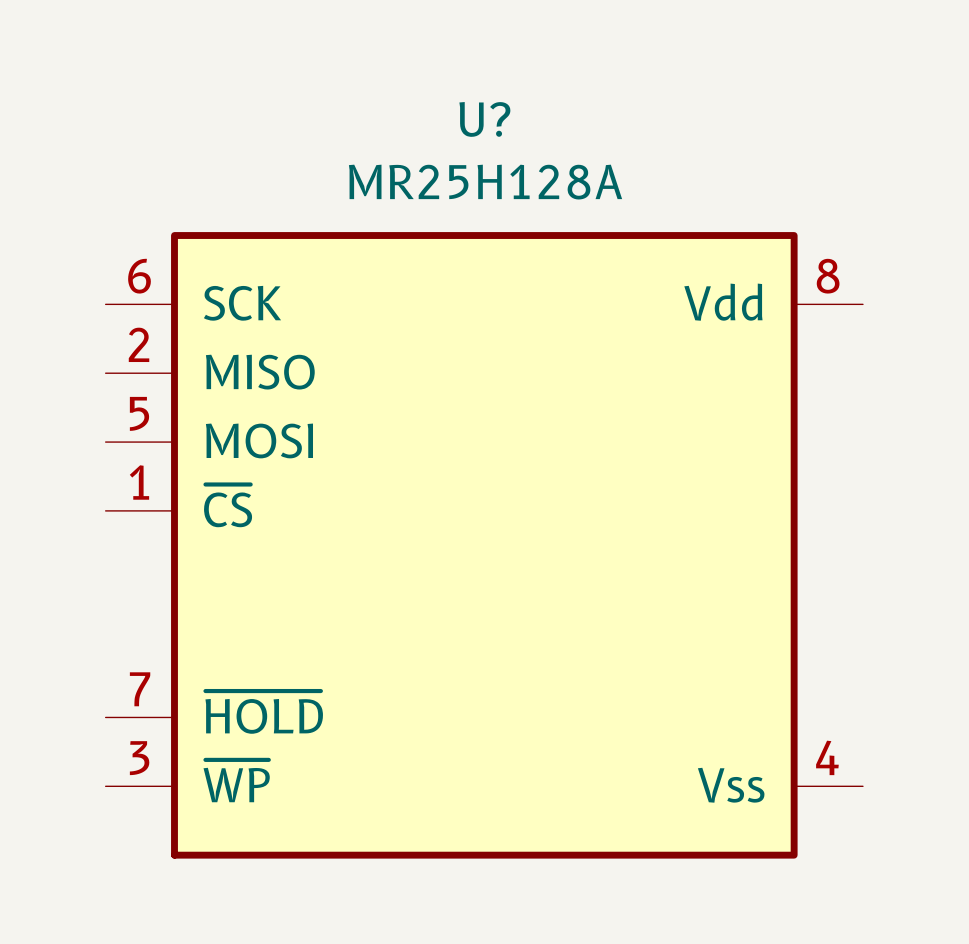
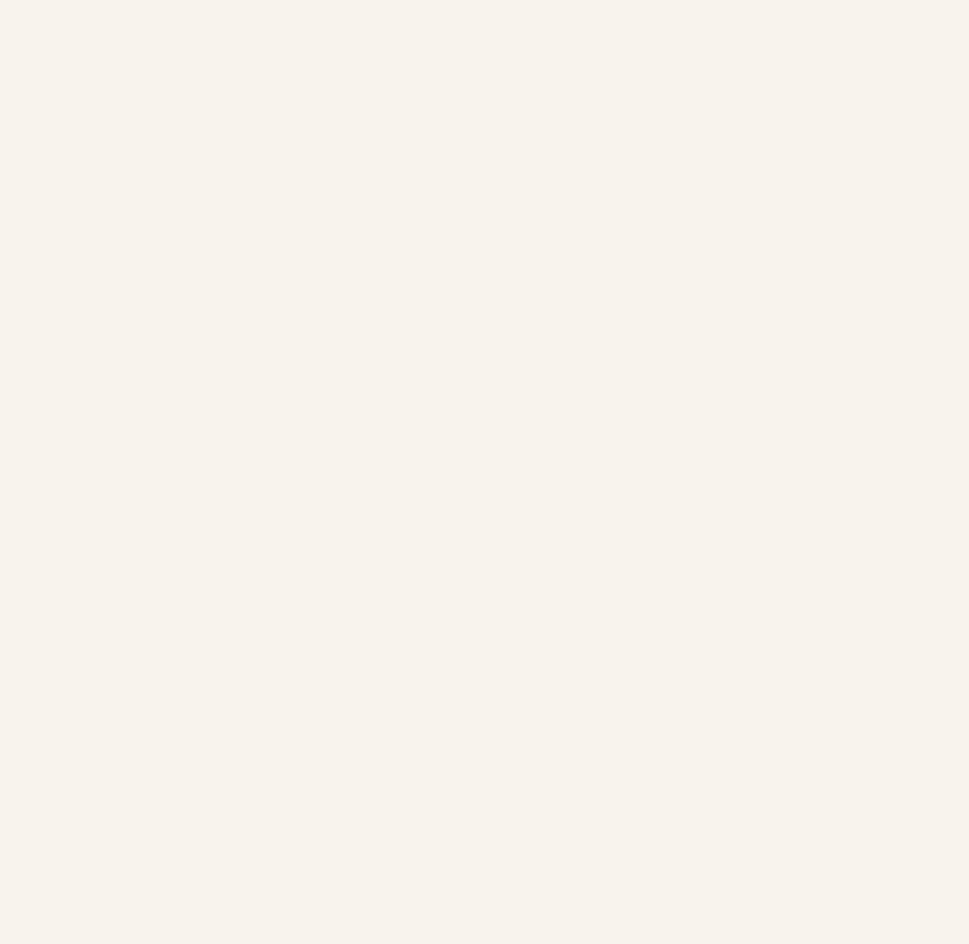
U?: MR25H128A (484, 545) -> none

